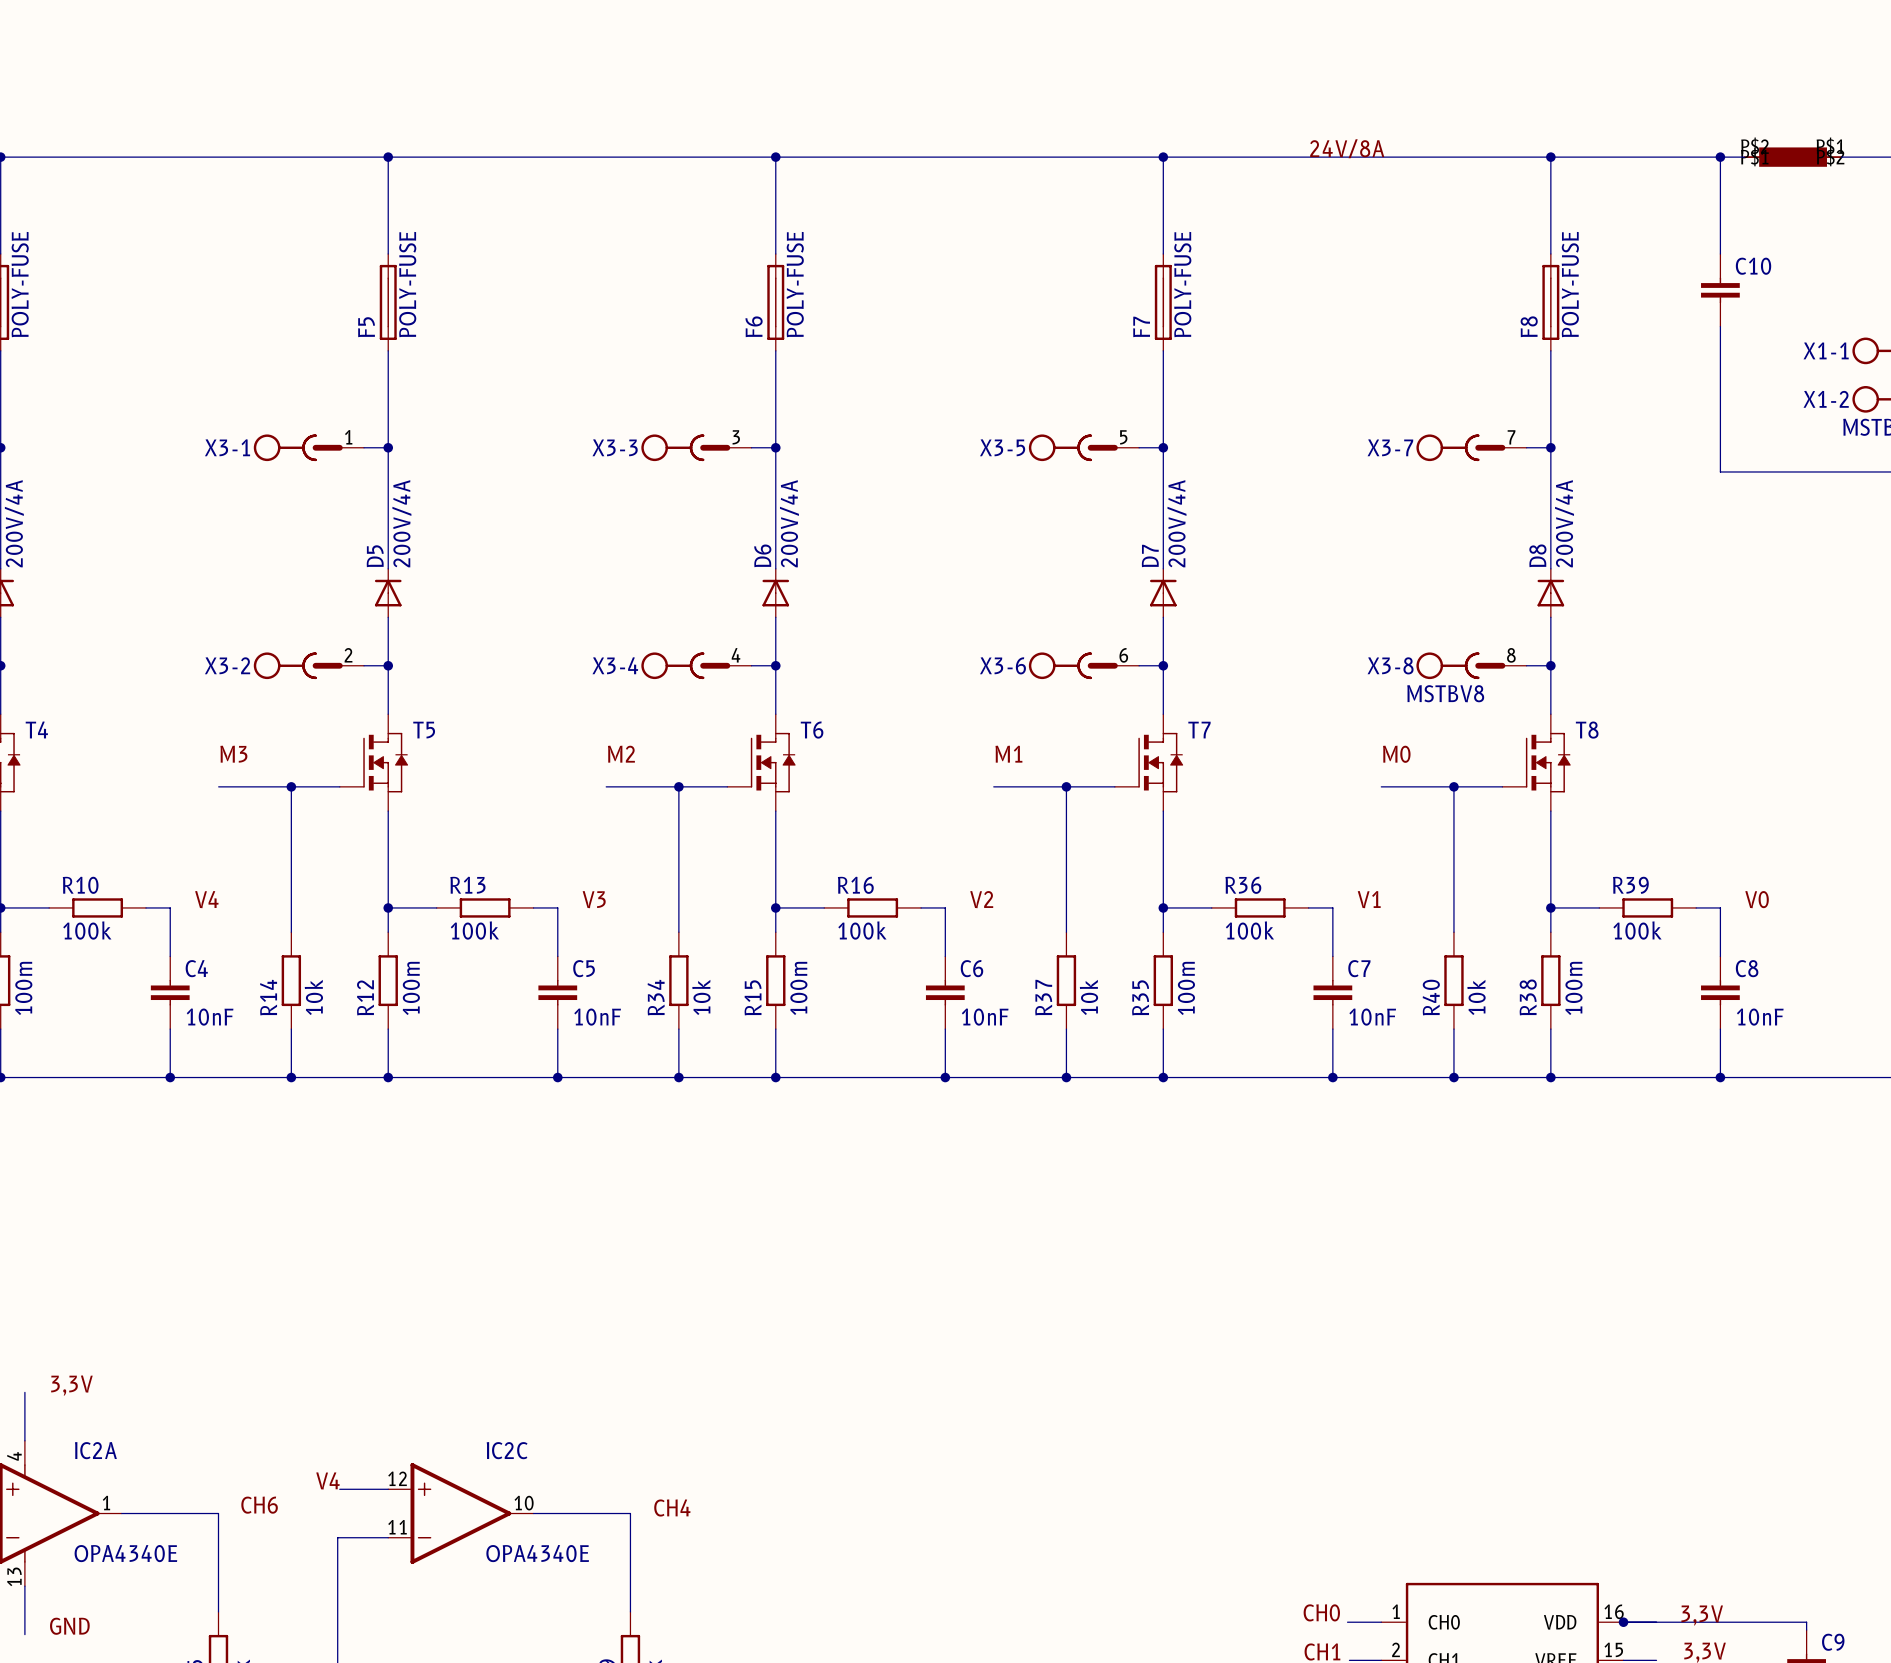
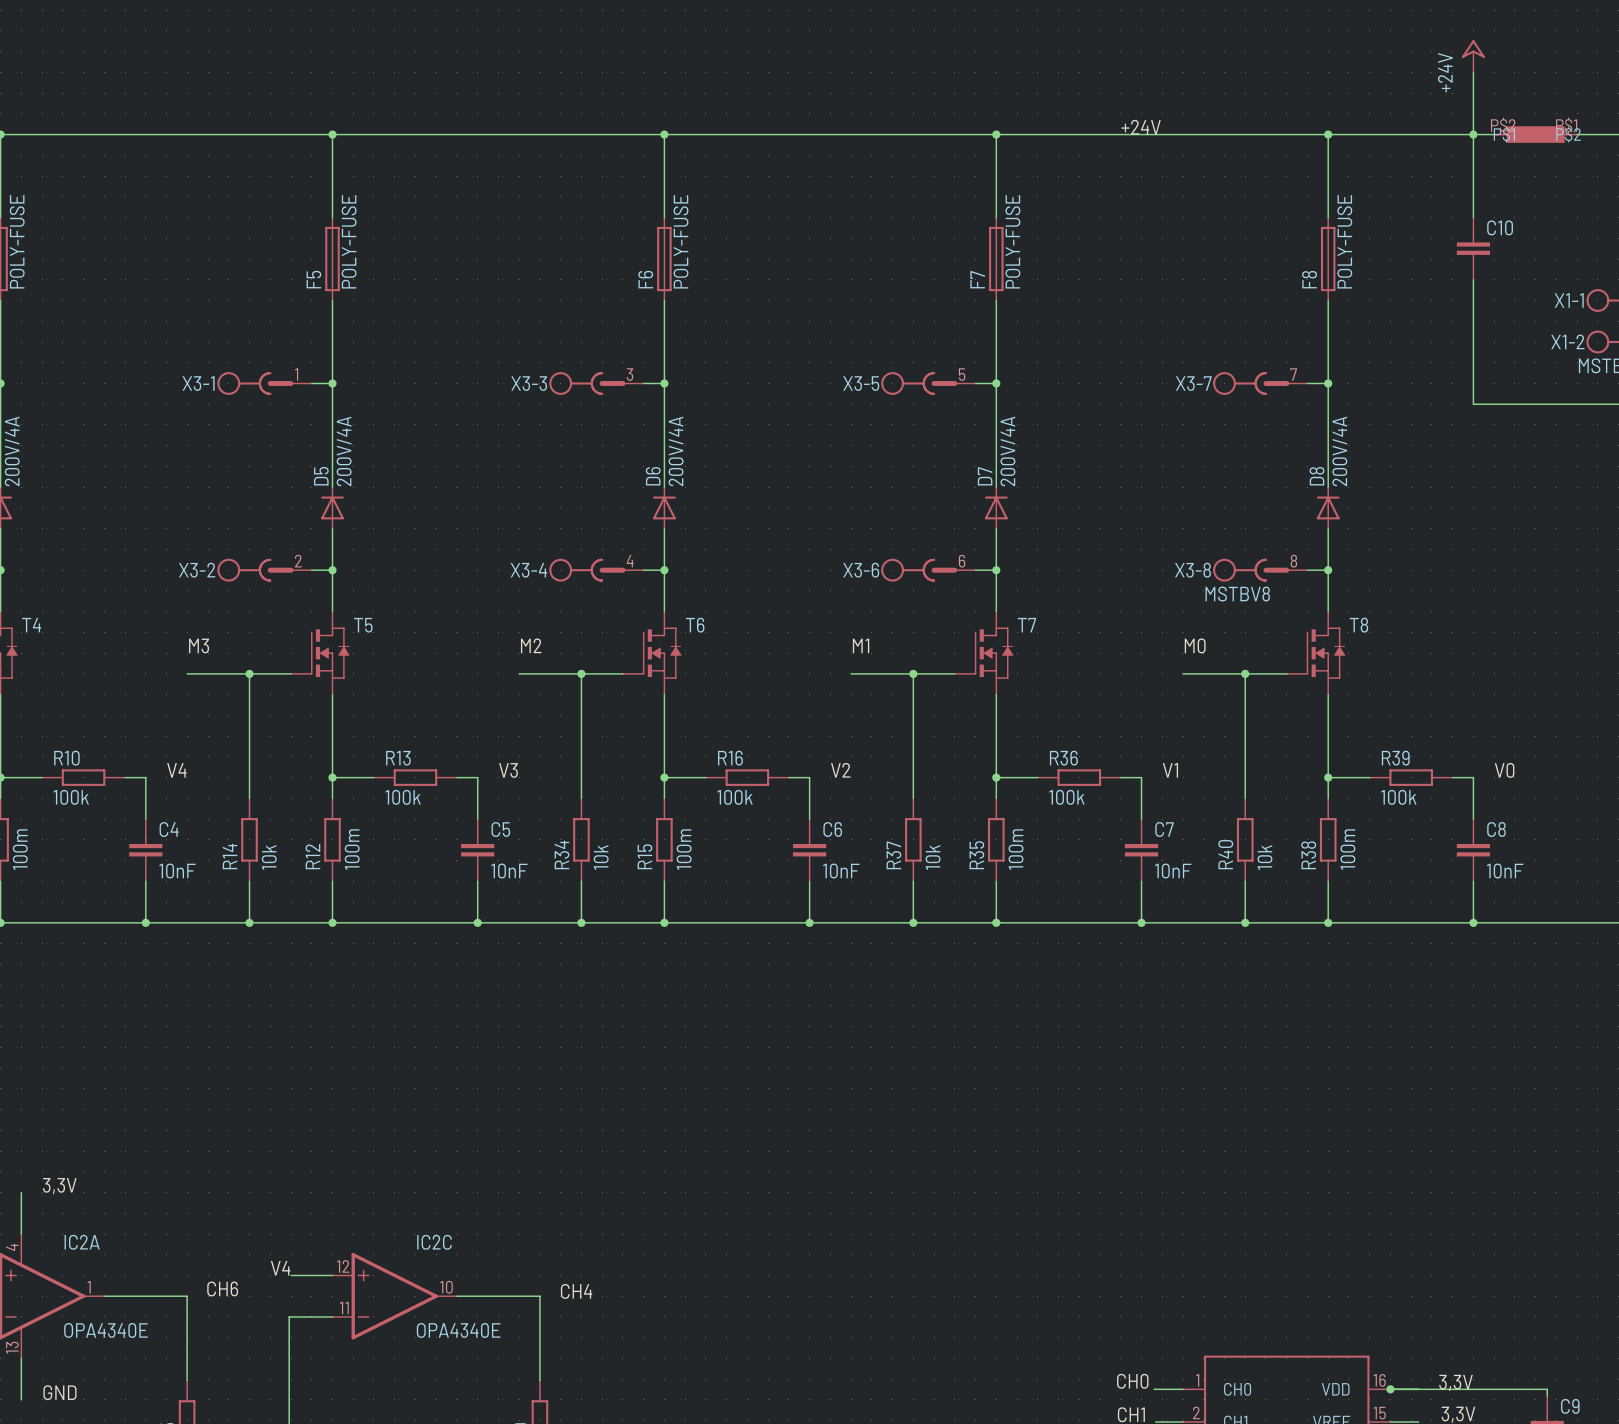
power symbol: none -> +24V (1473, 56)
wire: none -> (1473, 72) (1473, 134)
label: 24V/8A (1347, 148) -> +24V (1141, 127)

